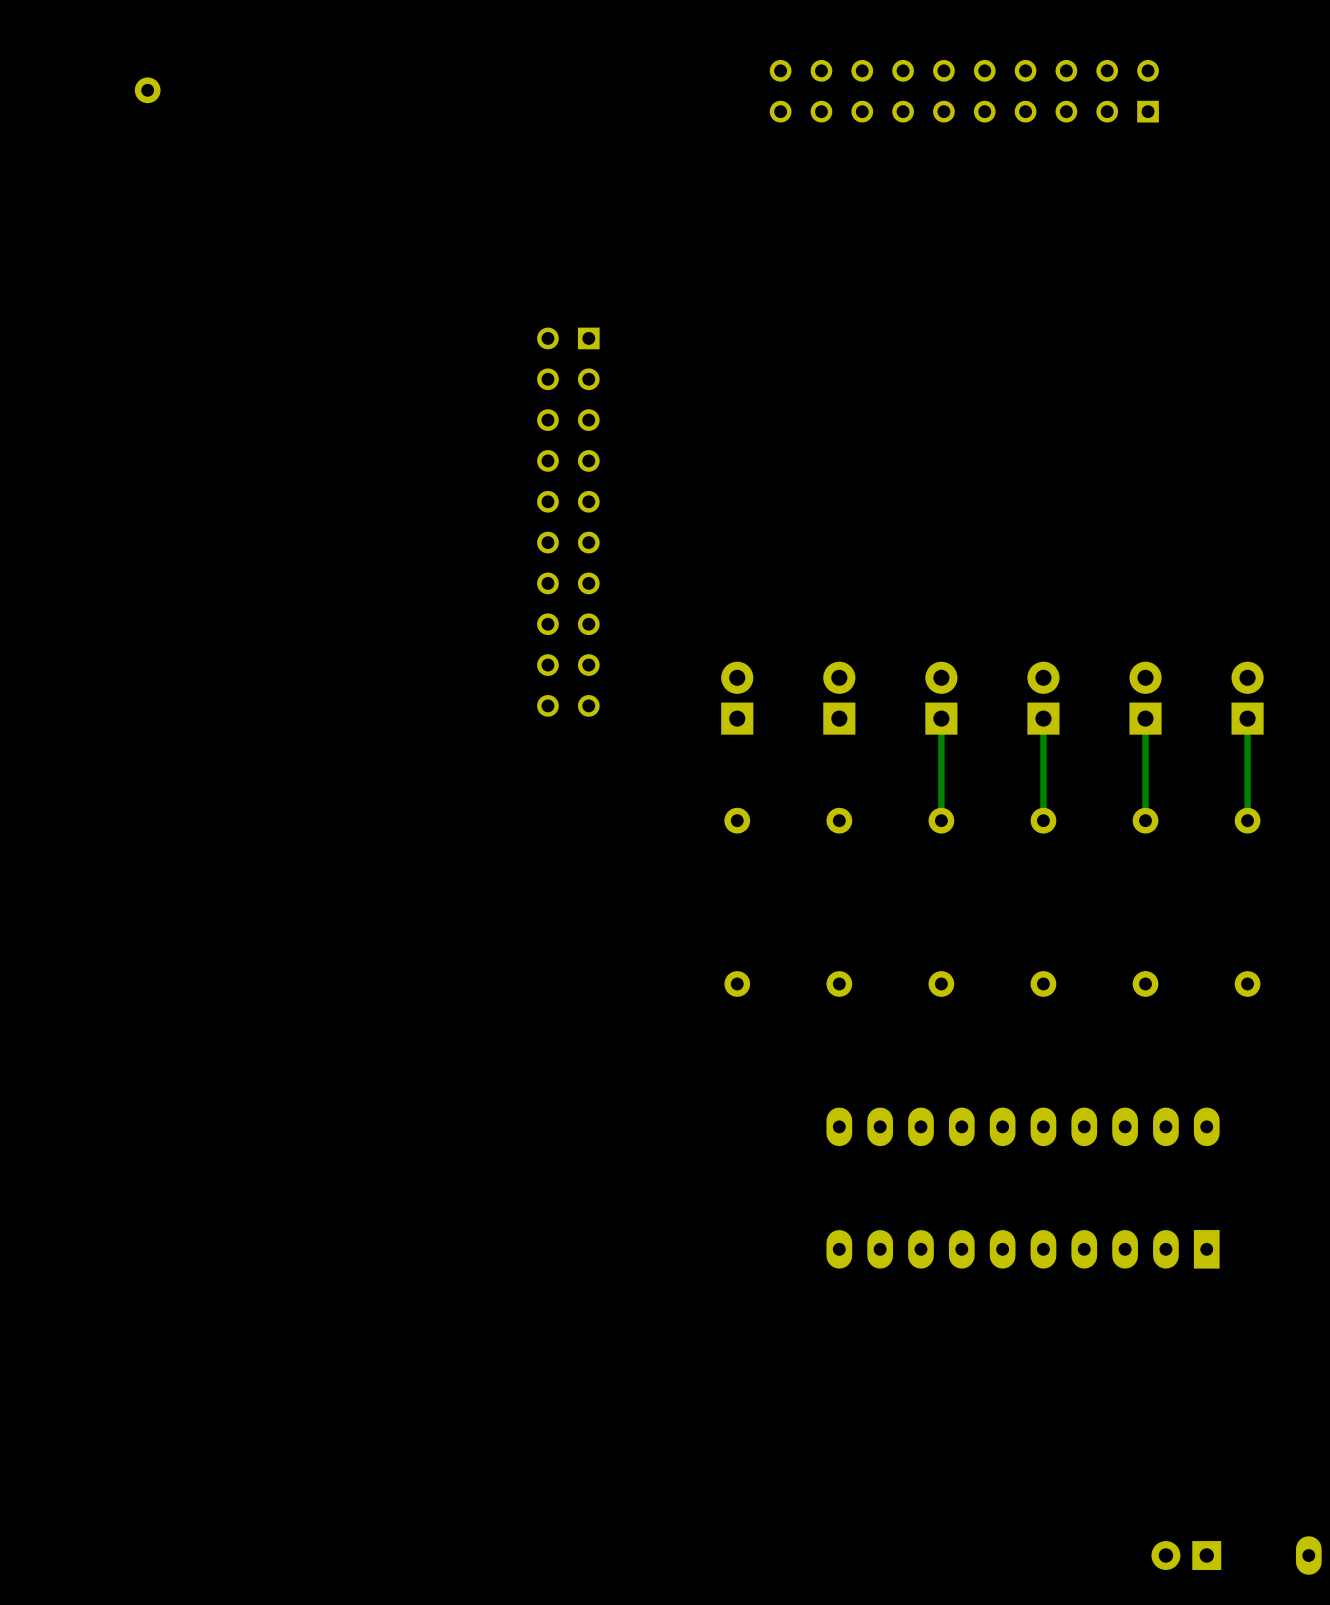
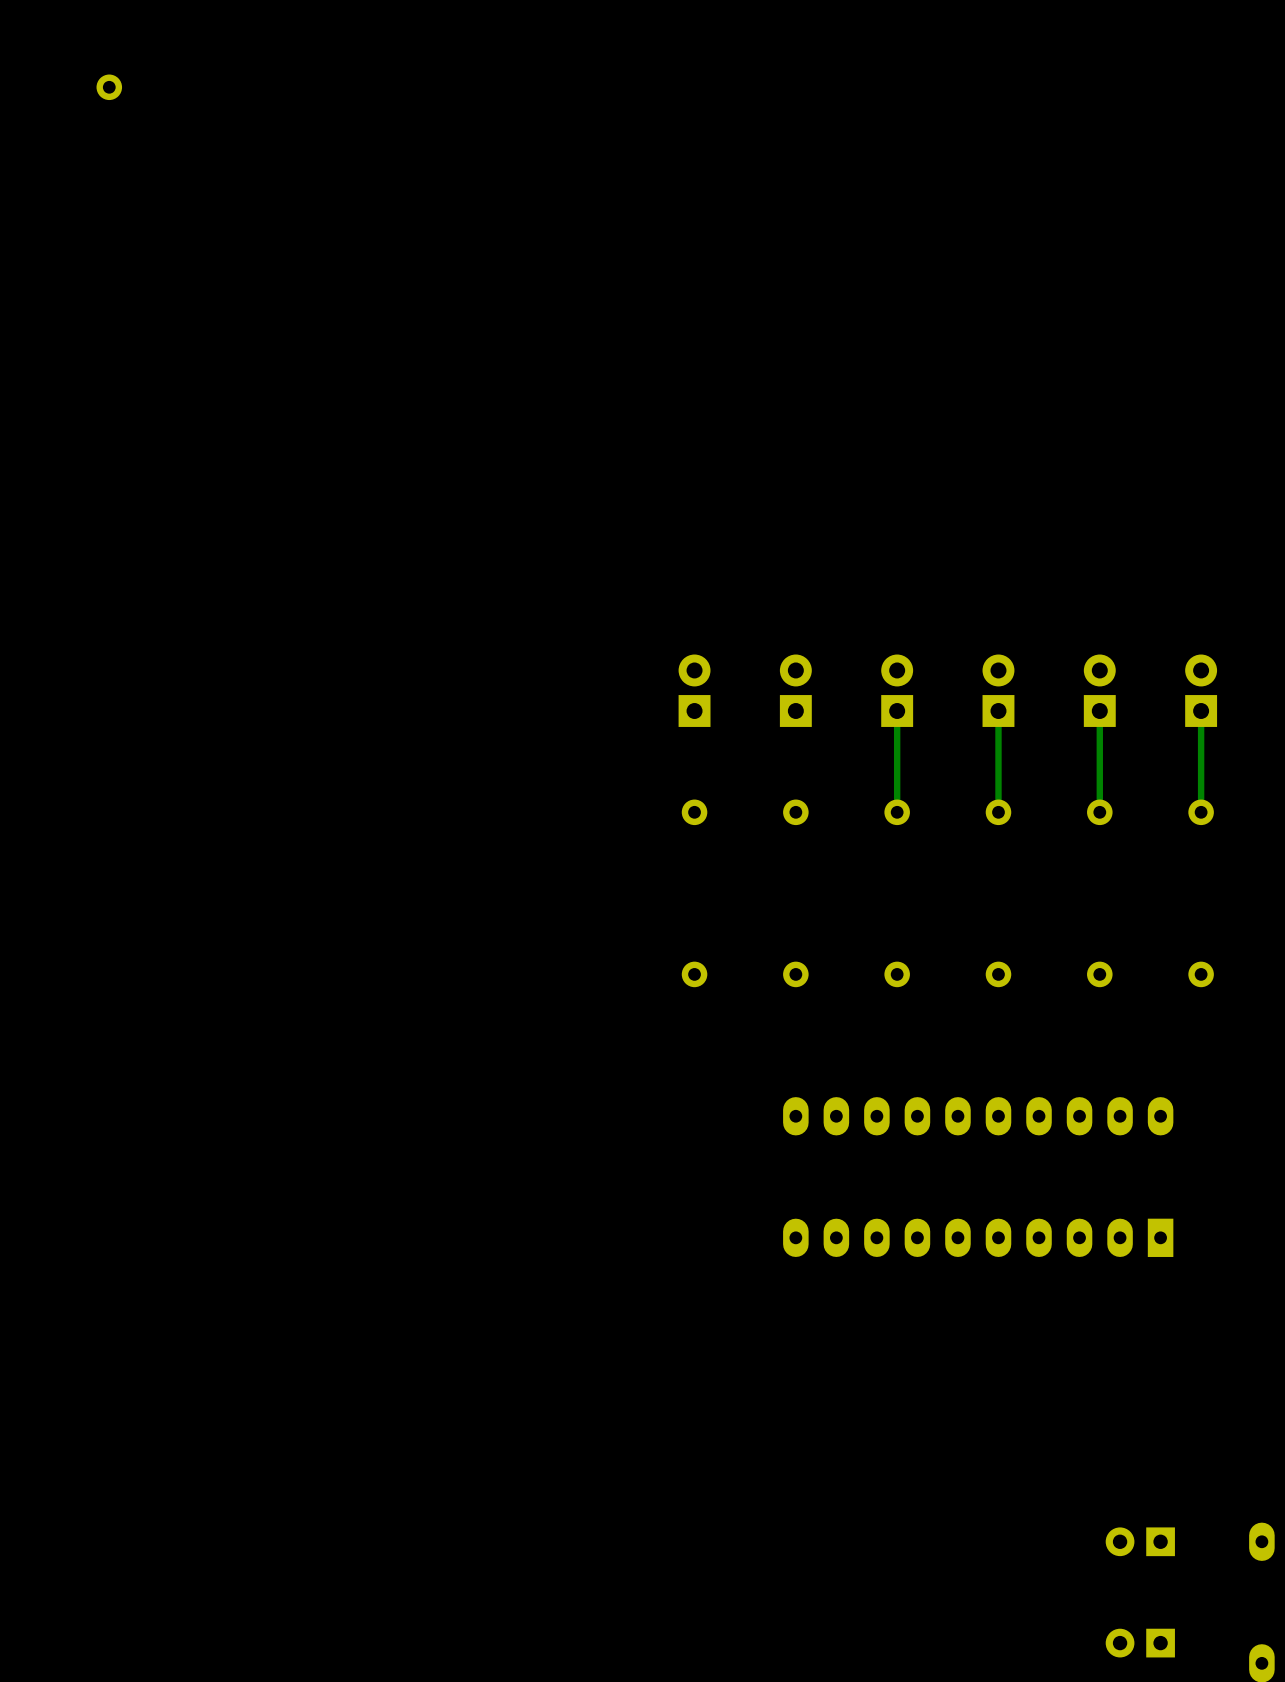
part: (964, 91) -> none
part: (568, 522) -> none

